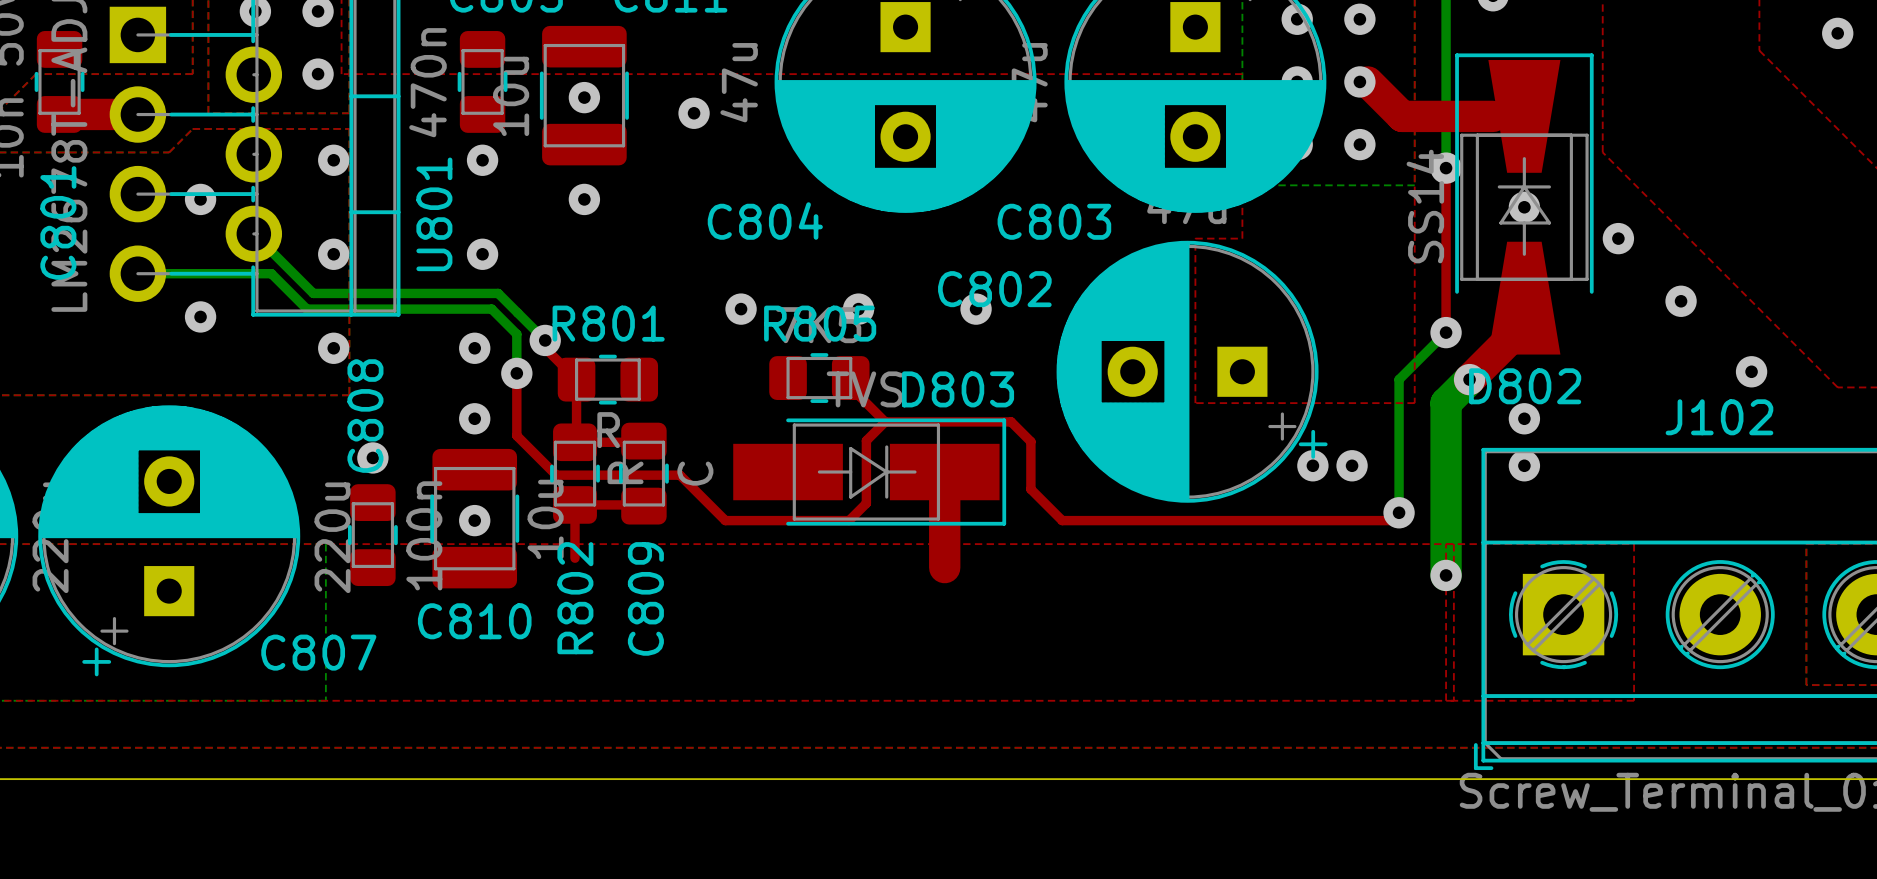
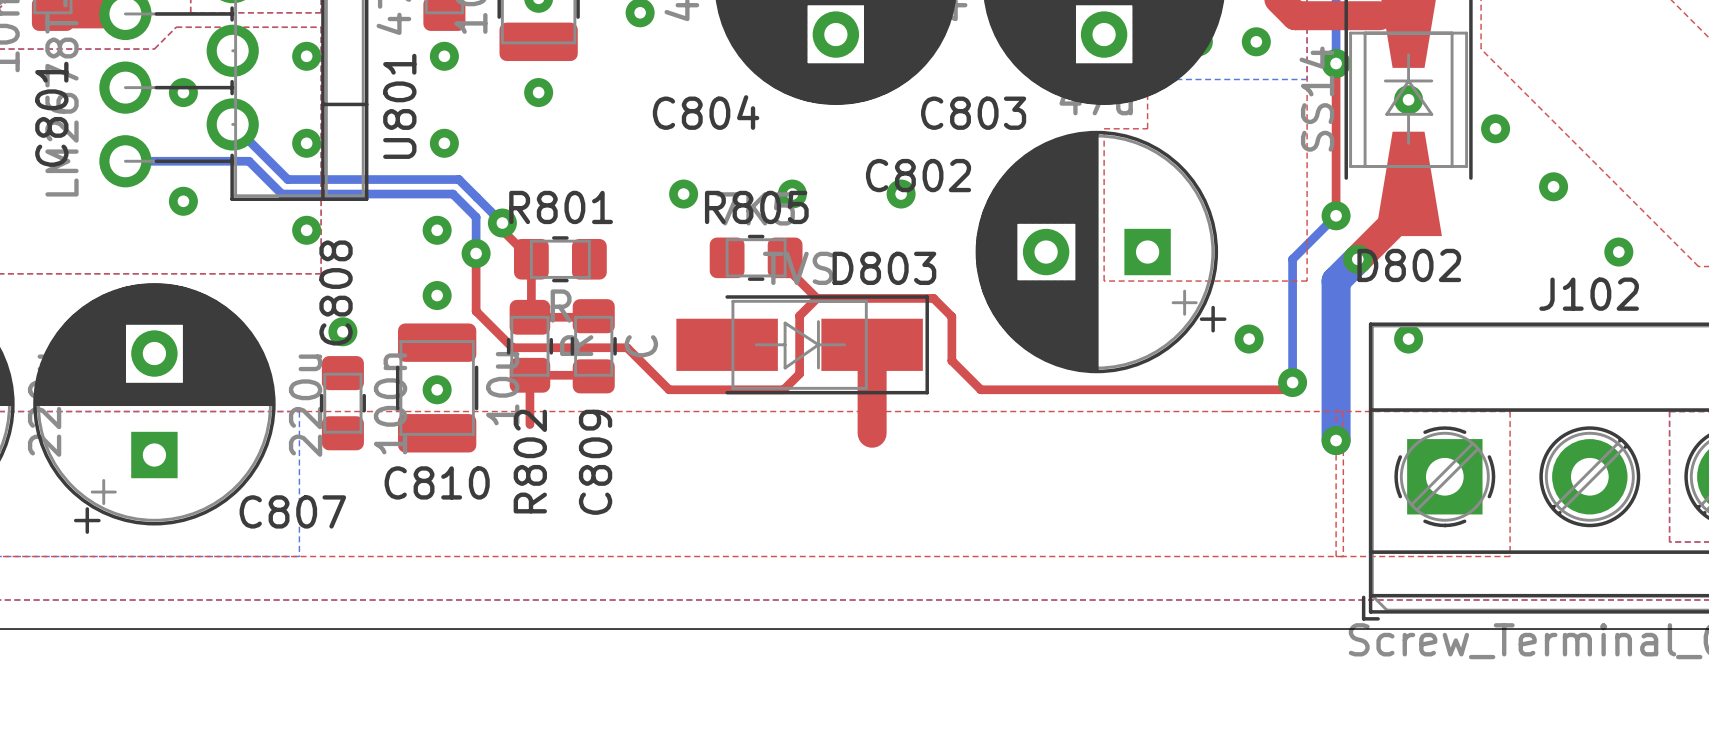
via: (1524, 418) -> none
via: (1312, 465) -> none

